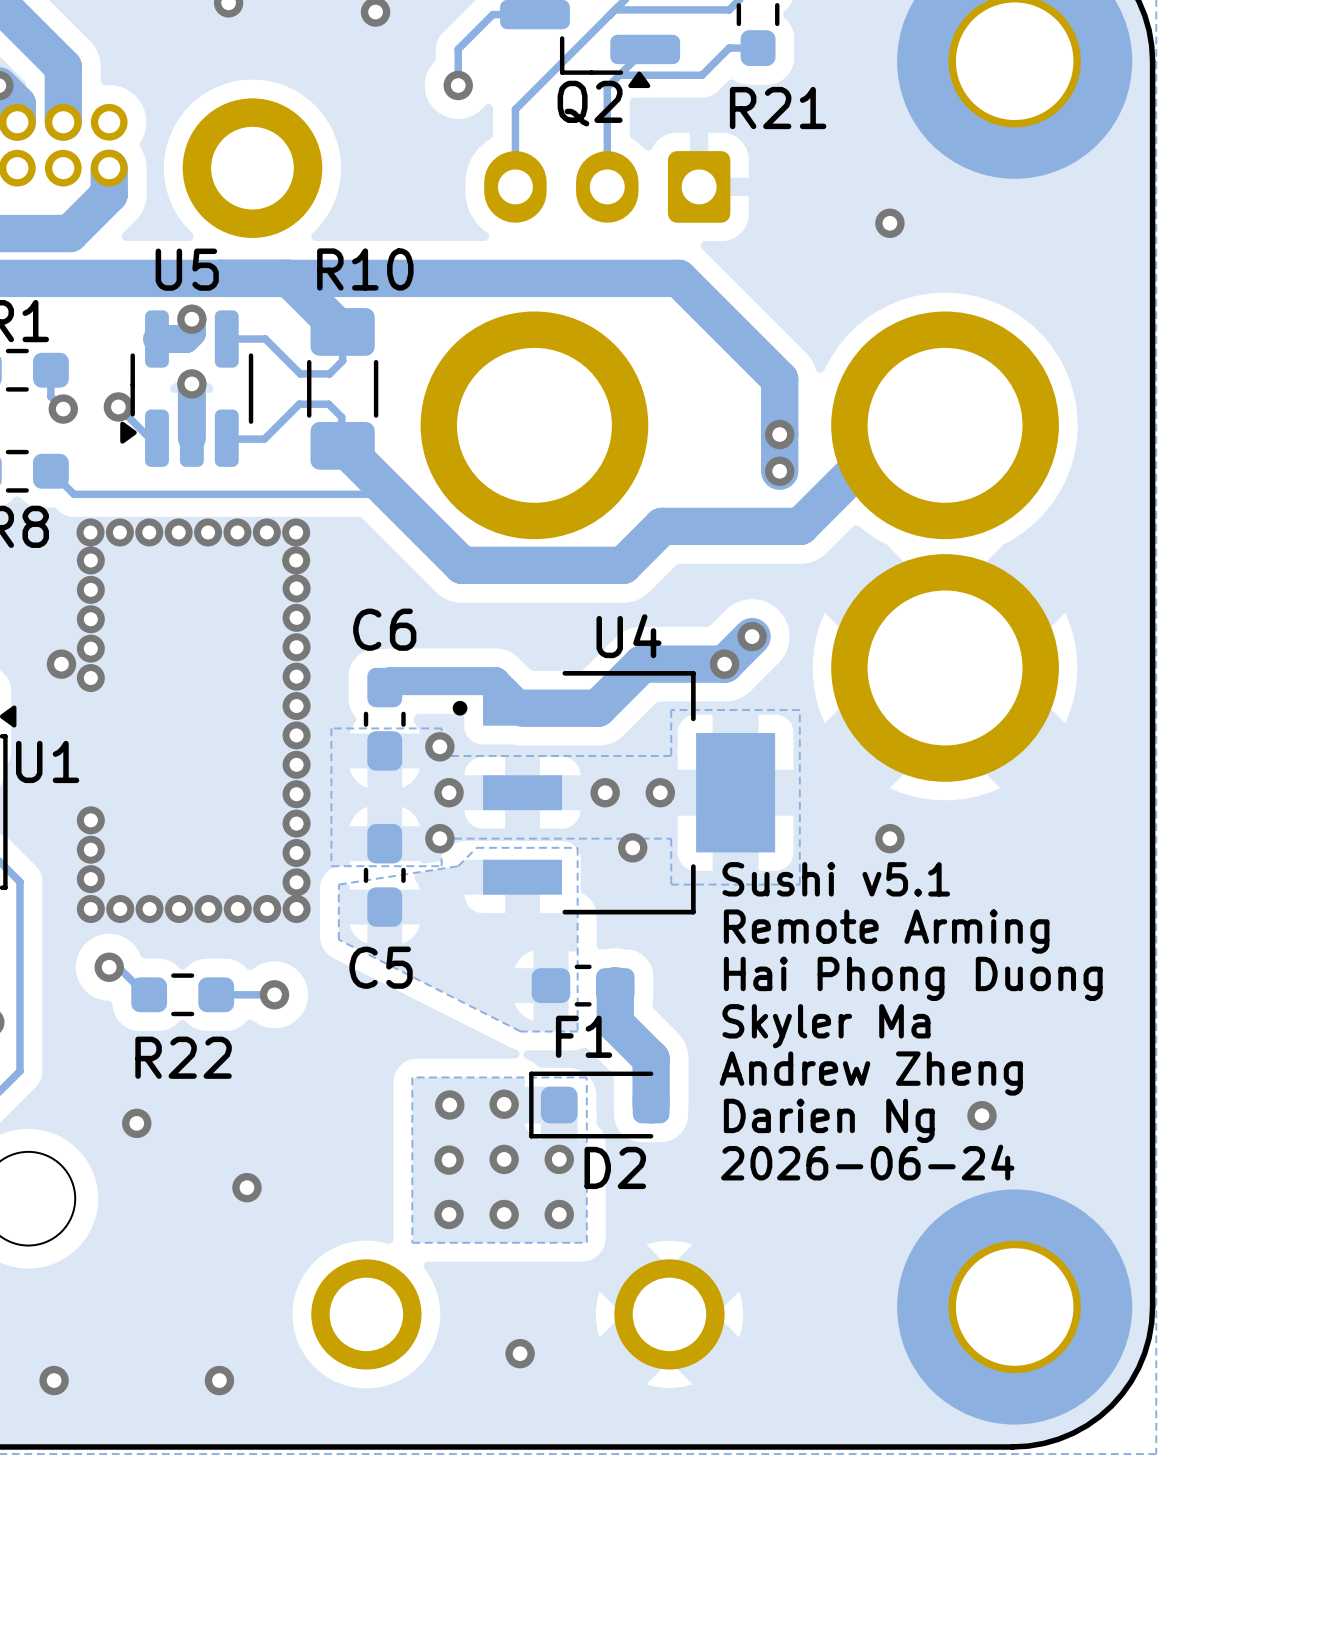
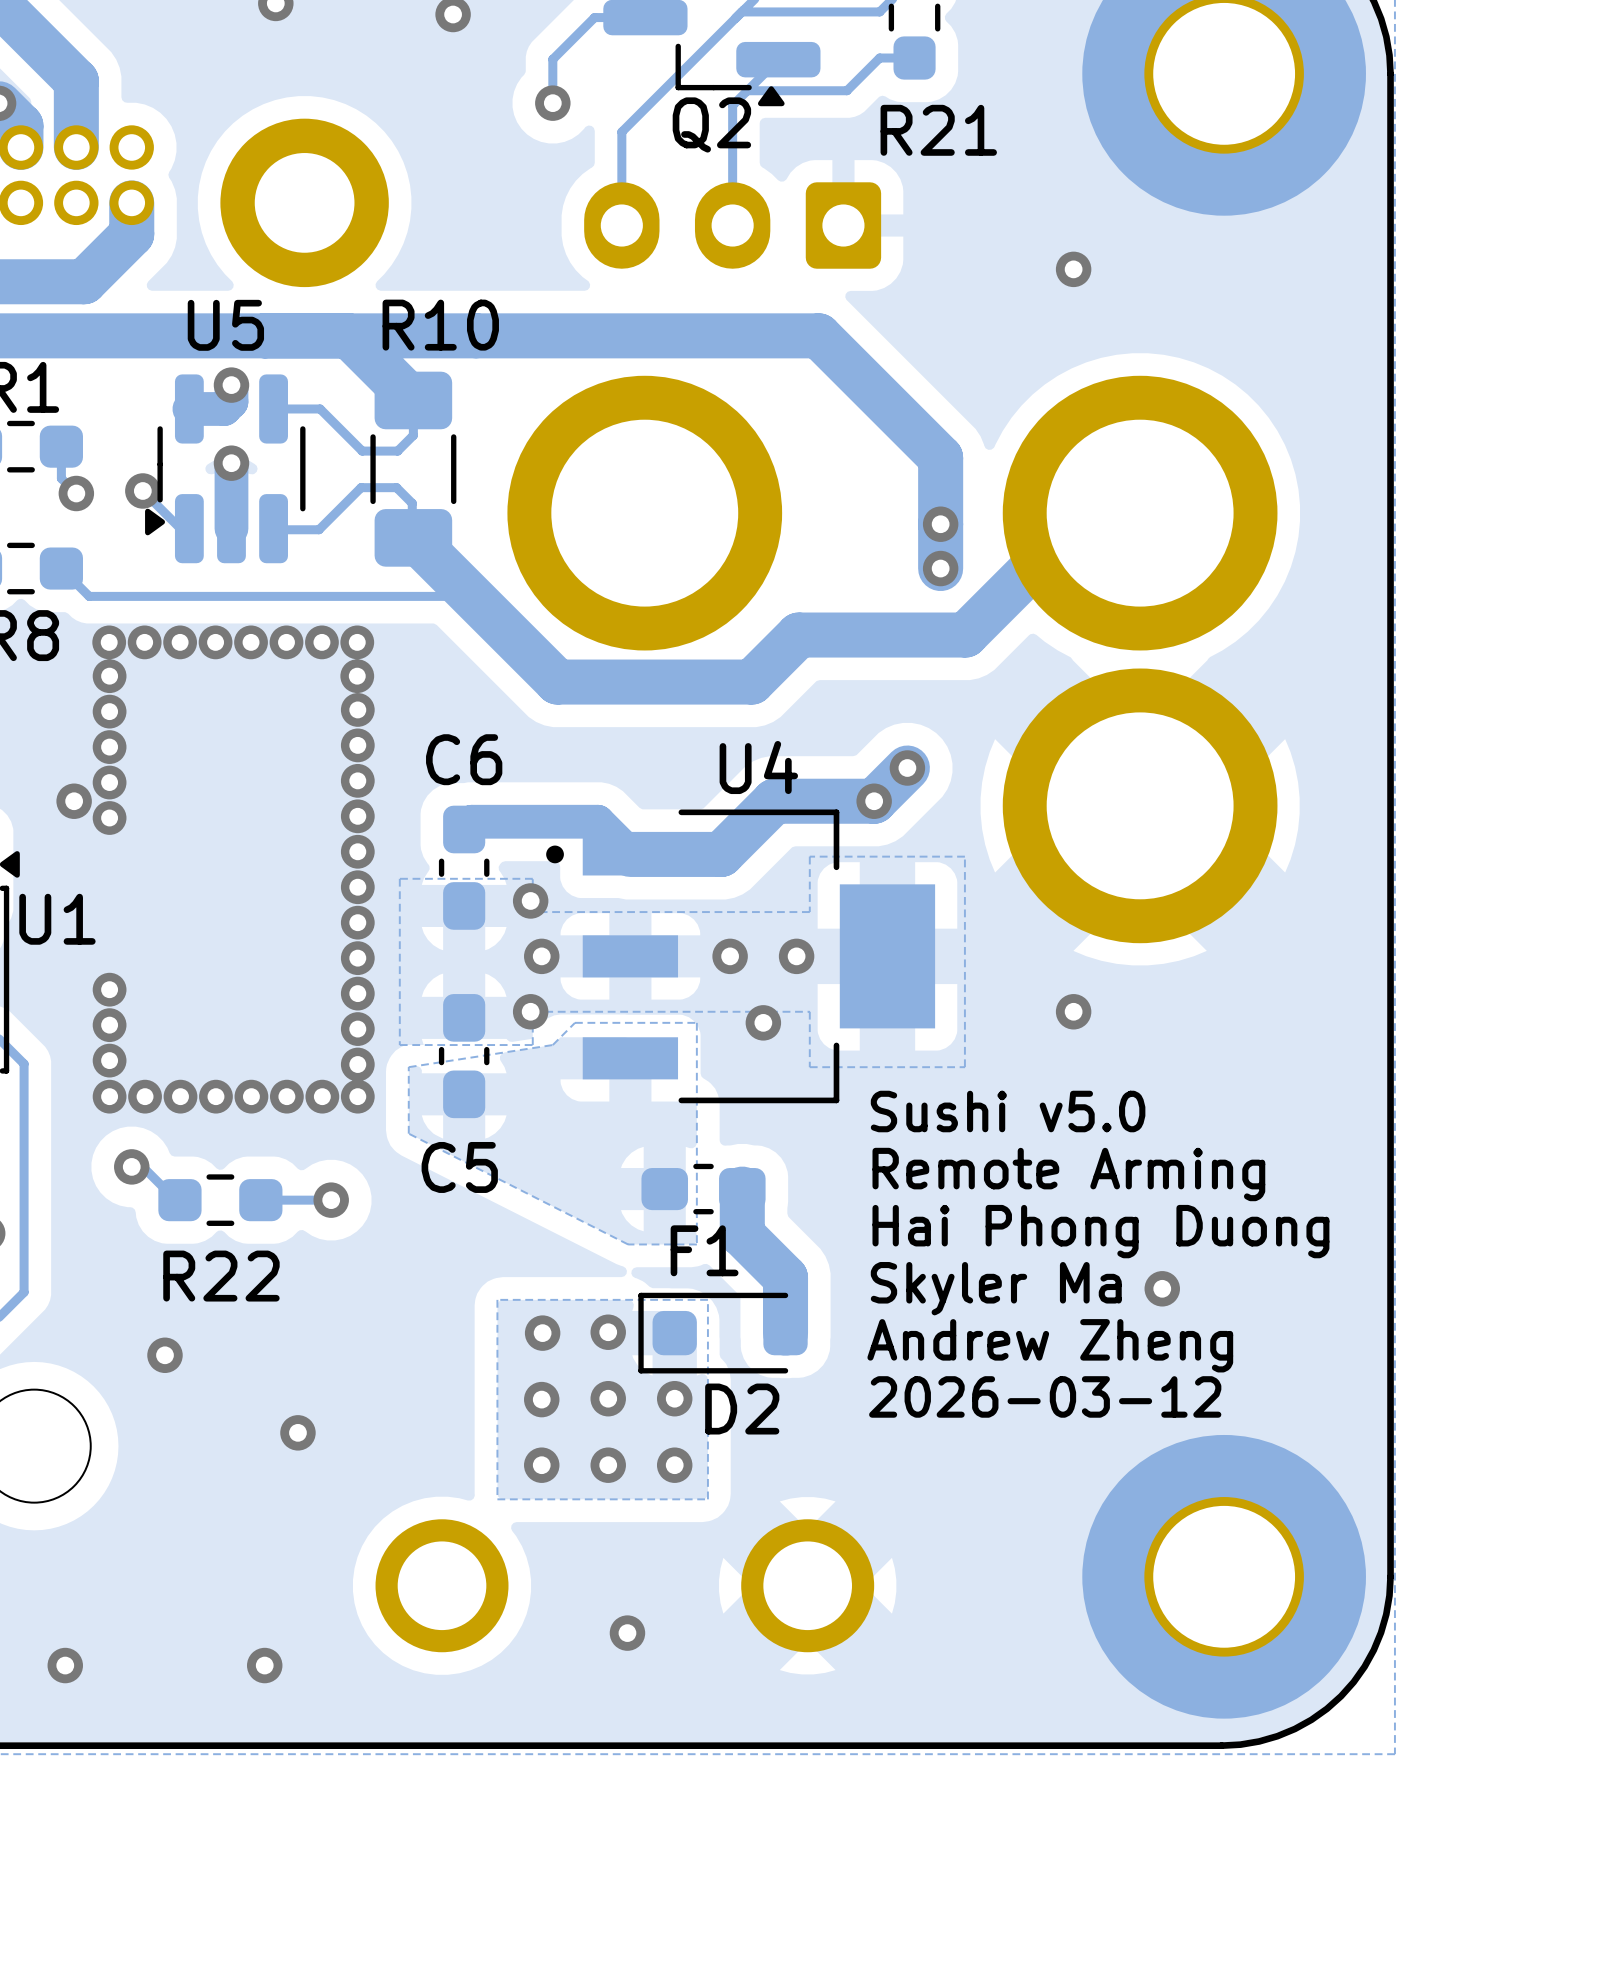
text: Sushi v5.1 (836, 879) -> Sushi v5.0 (1008, 1111)
text position: Remote Arming (886, 931) -> Remote Arming (1068, 1174)
text position: Hai Phong Duong (913, 978) -> Hai Phong Duong (1100, 1231)
text position: Skyler Ma (826, 1026) -> Skyler Ma (996, 1288)
text position: Andrew Zheng (871, 1073) -> Andrew Zheng (1050, 1345)
via position: (982, 1115) -> (1162, 1288)
text: Darien Ng (829, 1120) -> none
text: 2026-06-24 (867, 1162) -> 2026-03-12 (1045, 1396)

